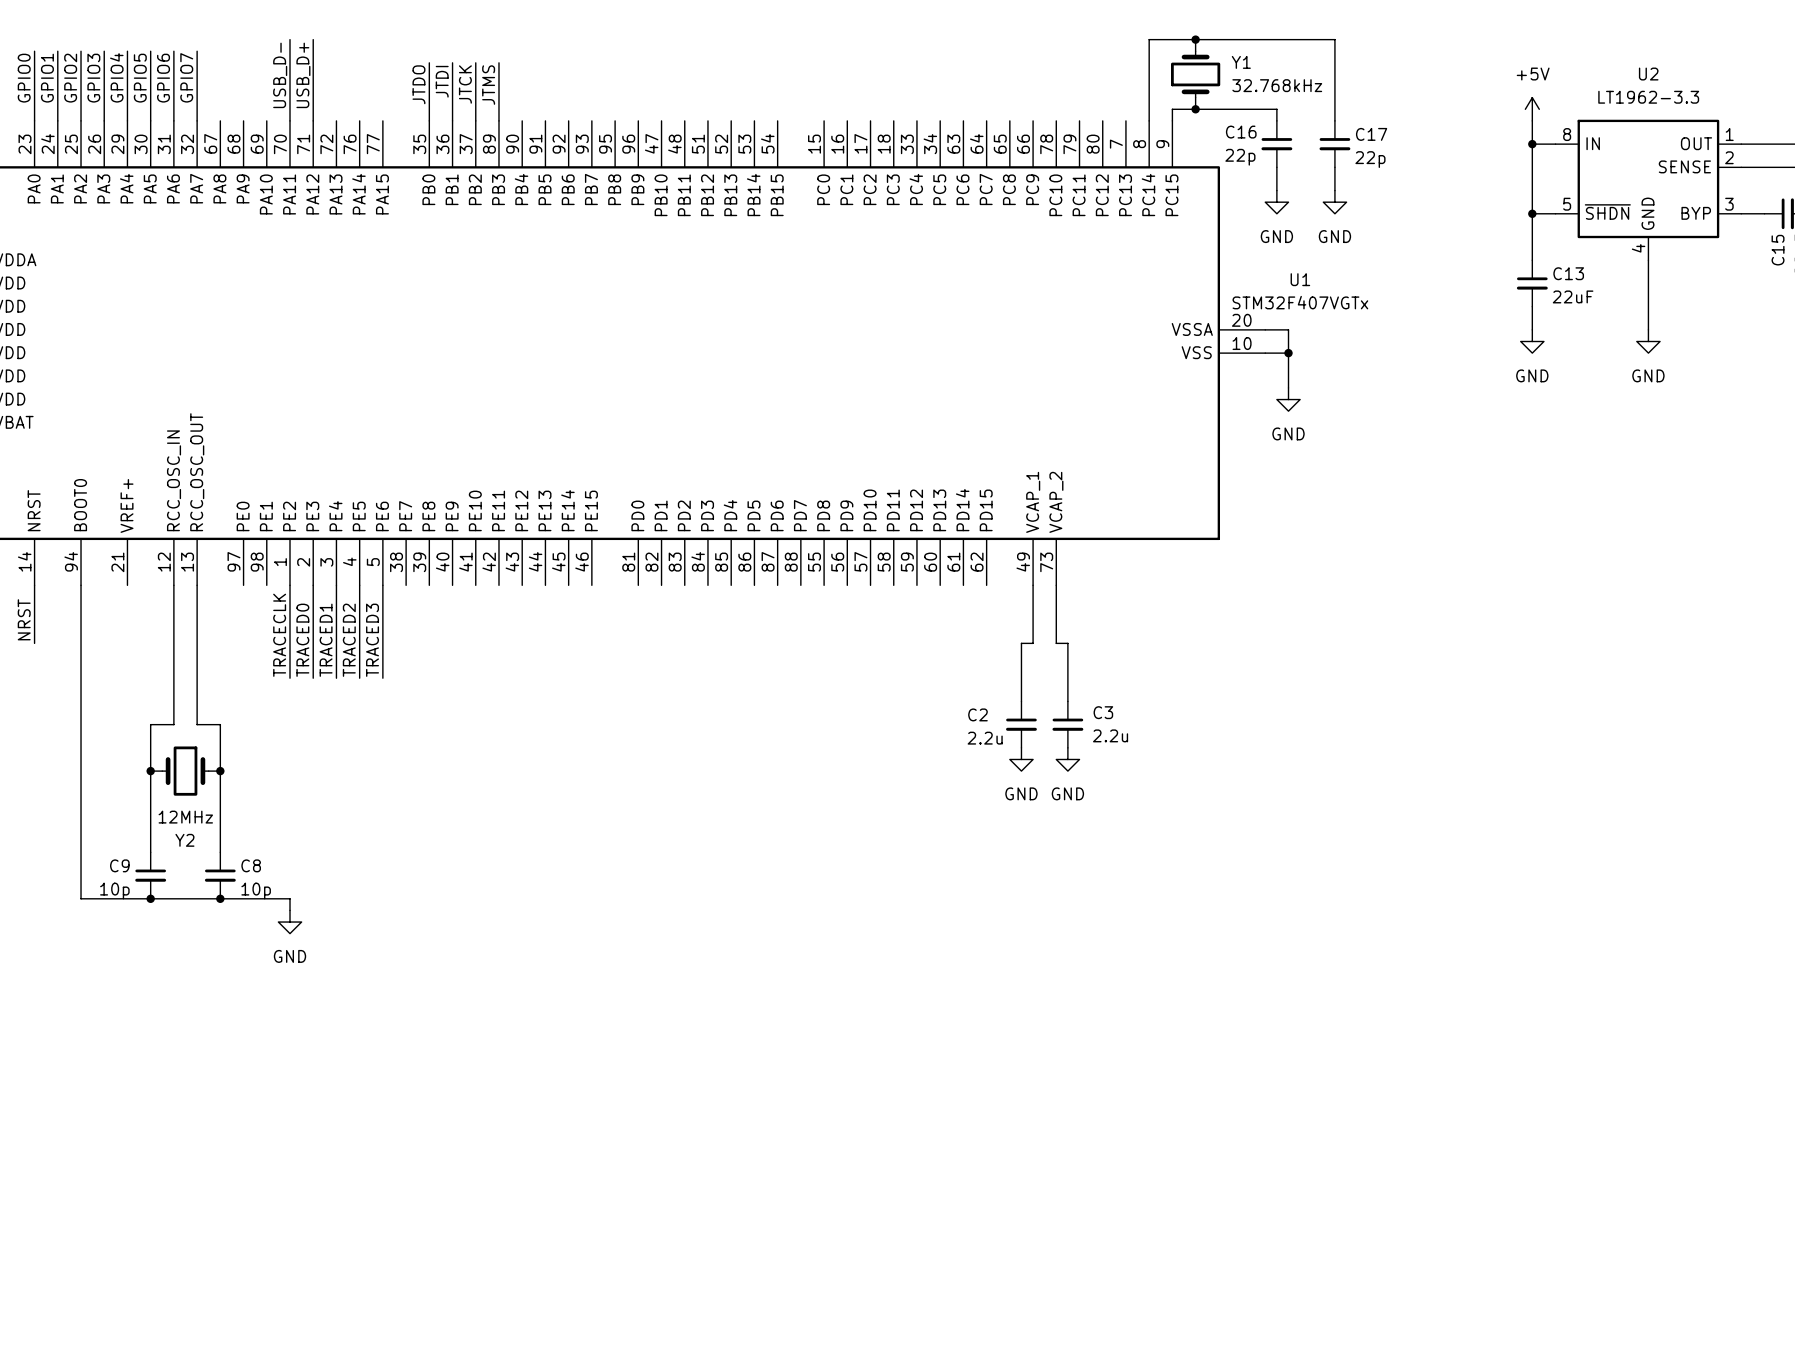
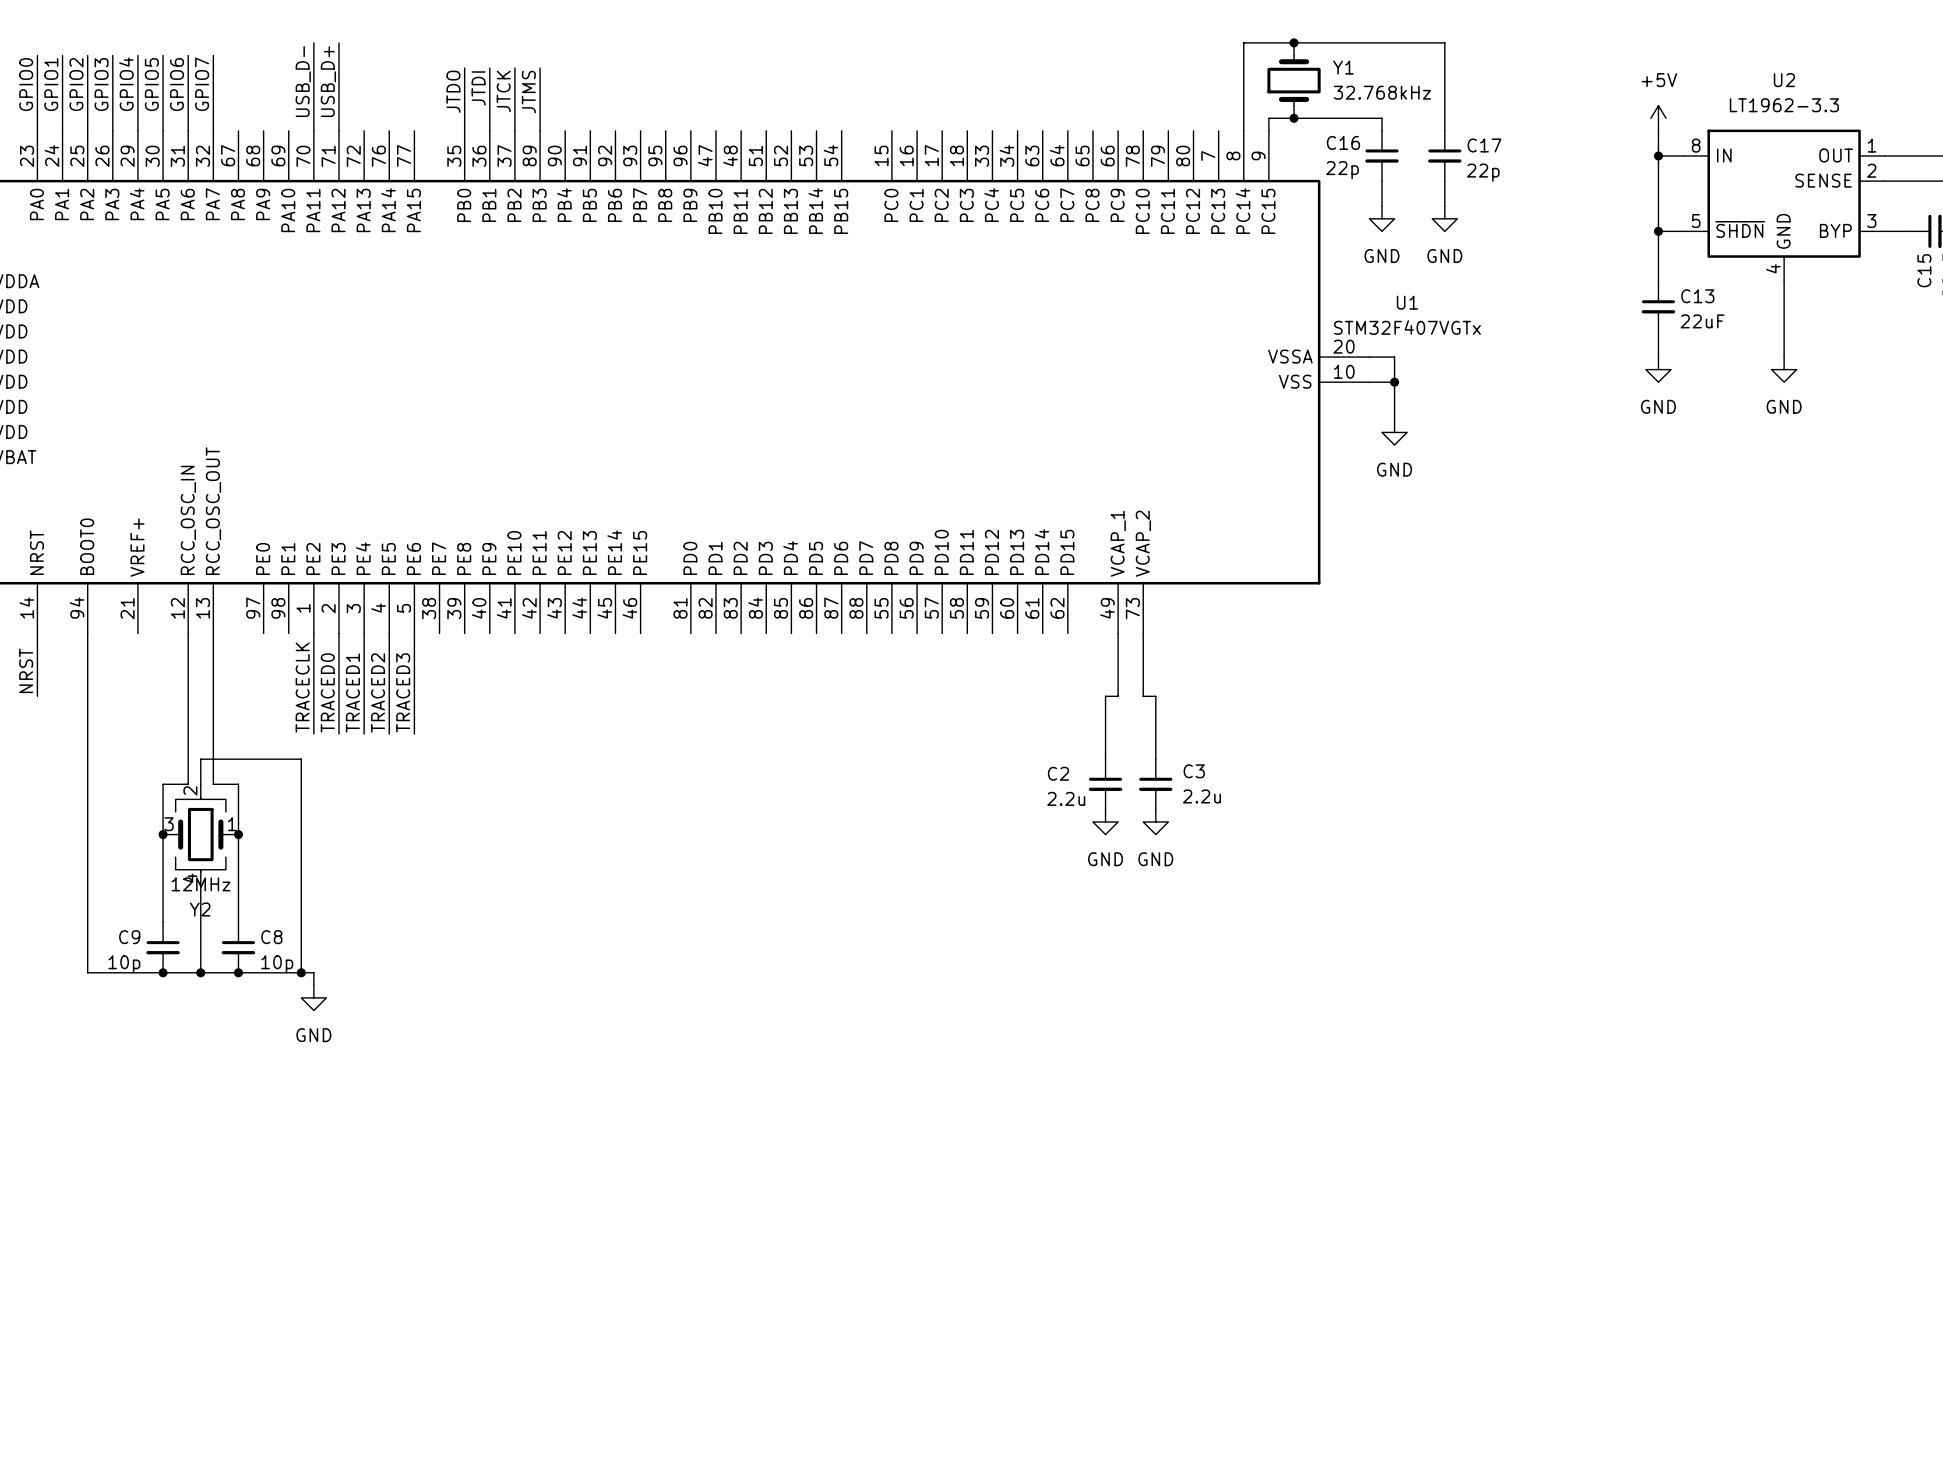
wire: none -> (200, 784) (200, 759) (301, 759) (301, 972)
Y2 symbol: [150, 746, 221, 796] -> [163, 784, 239, 885]
wire: none -> (200, 884) (200, 972)
junction: none -> (200, 972)
junction: none -> (301, 972)

